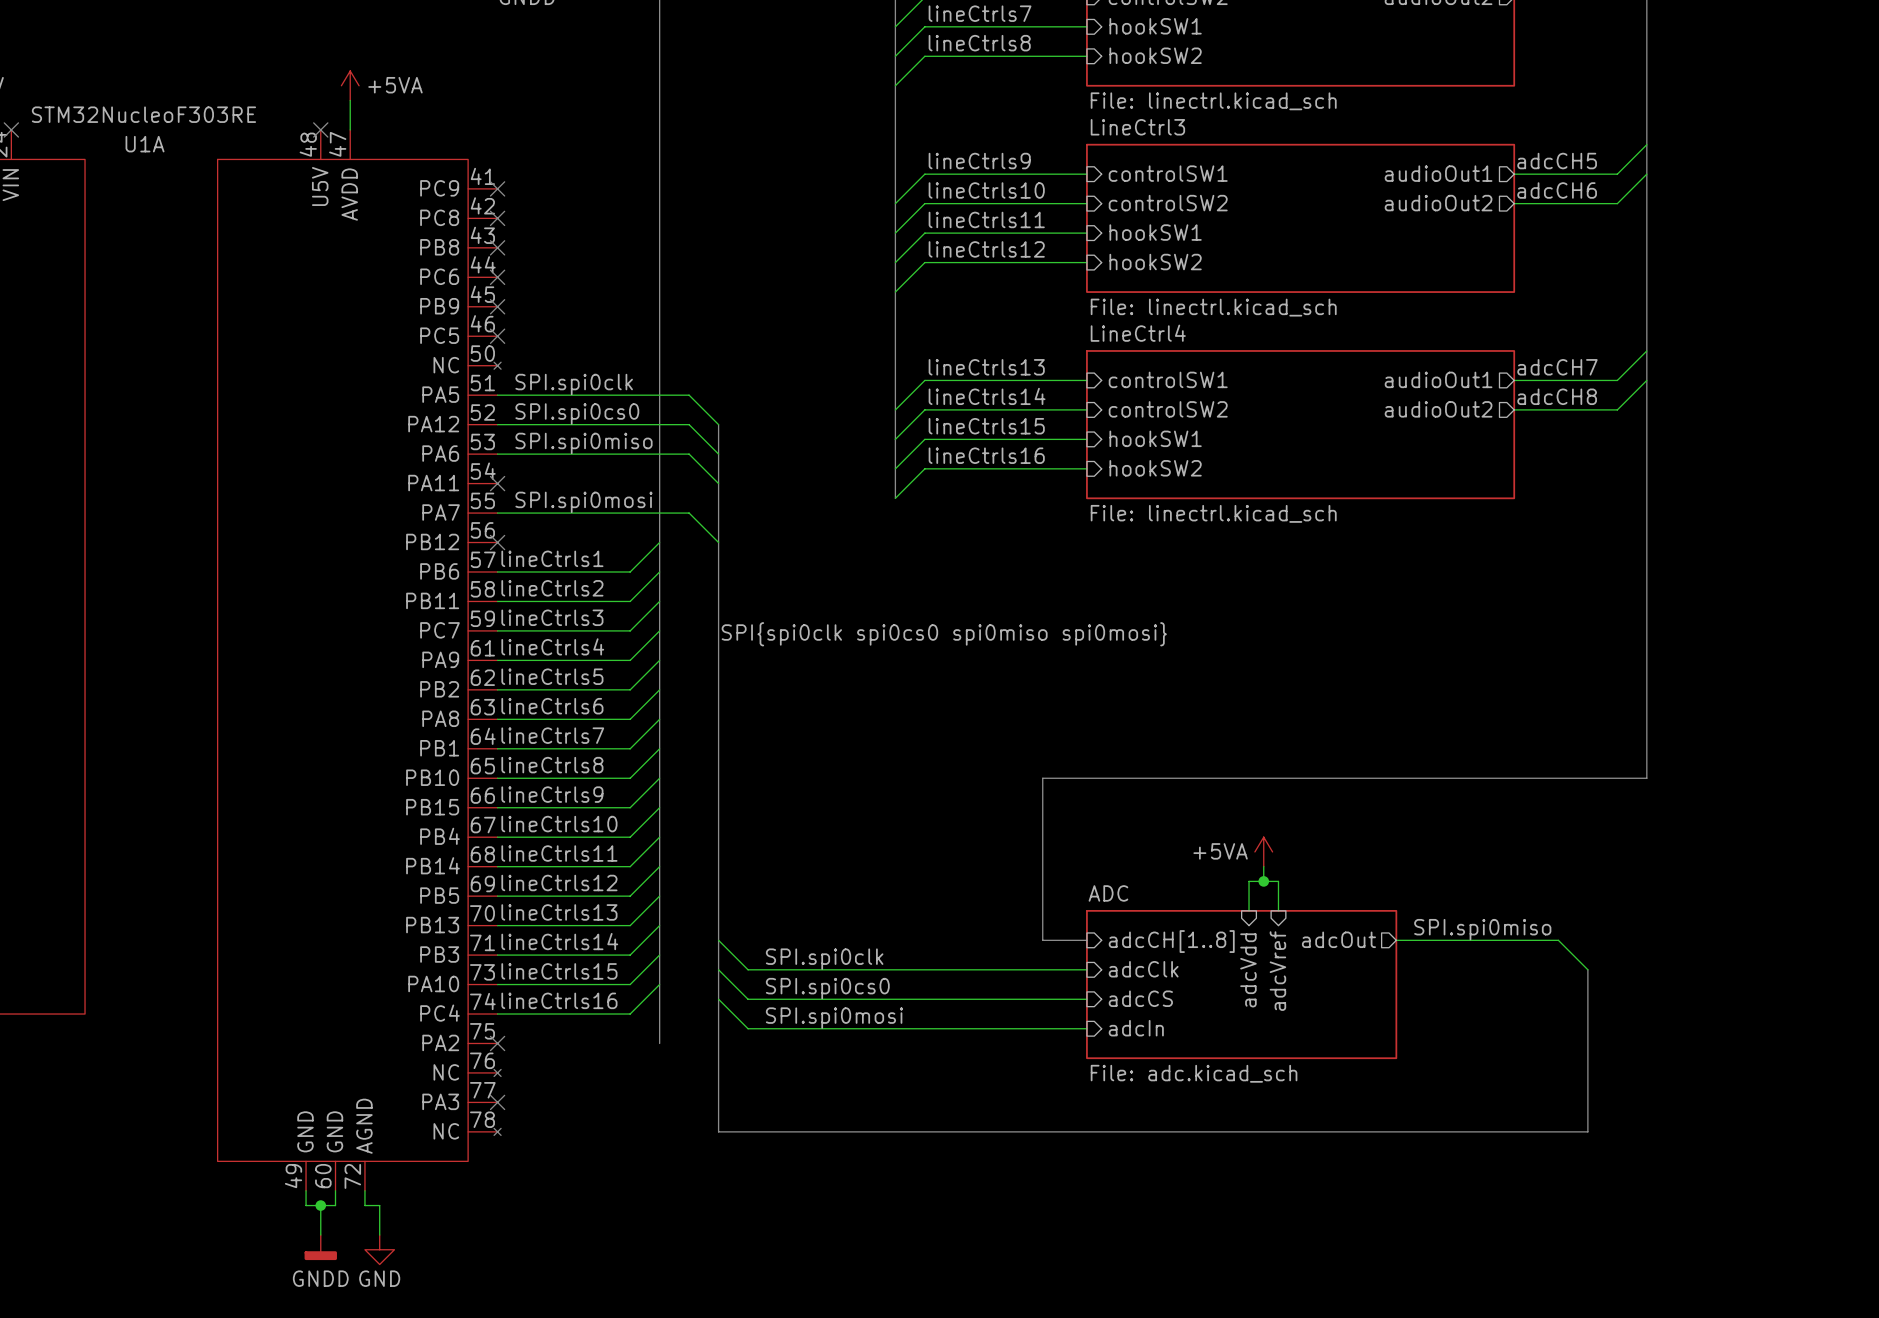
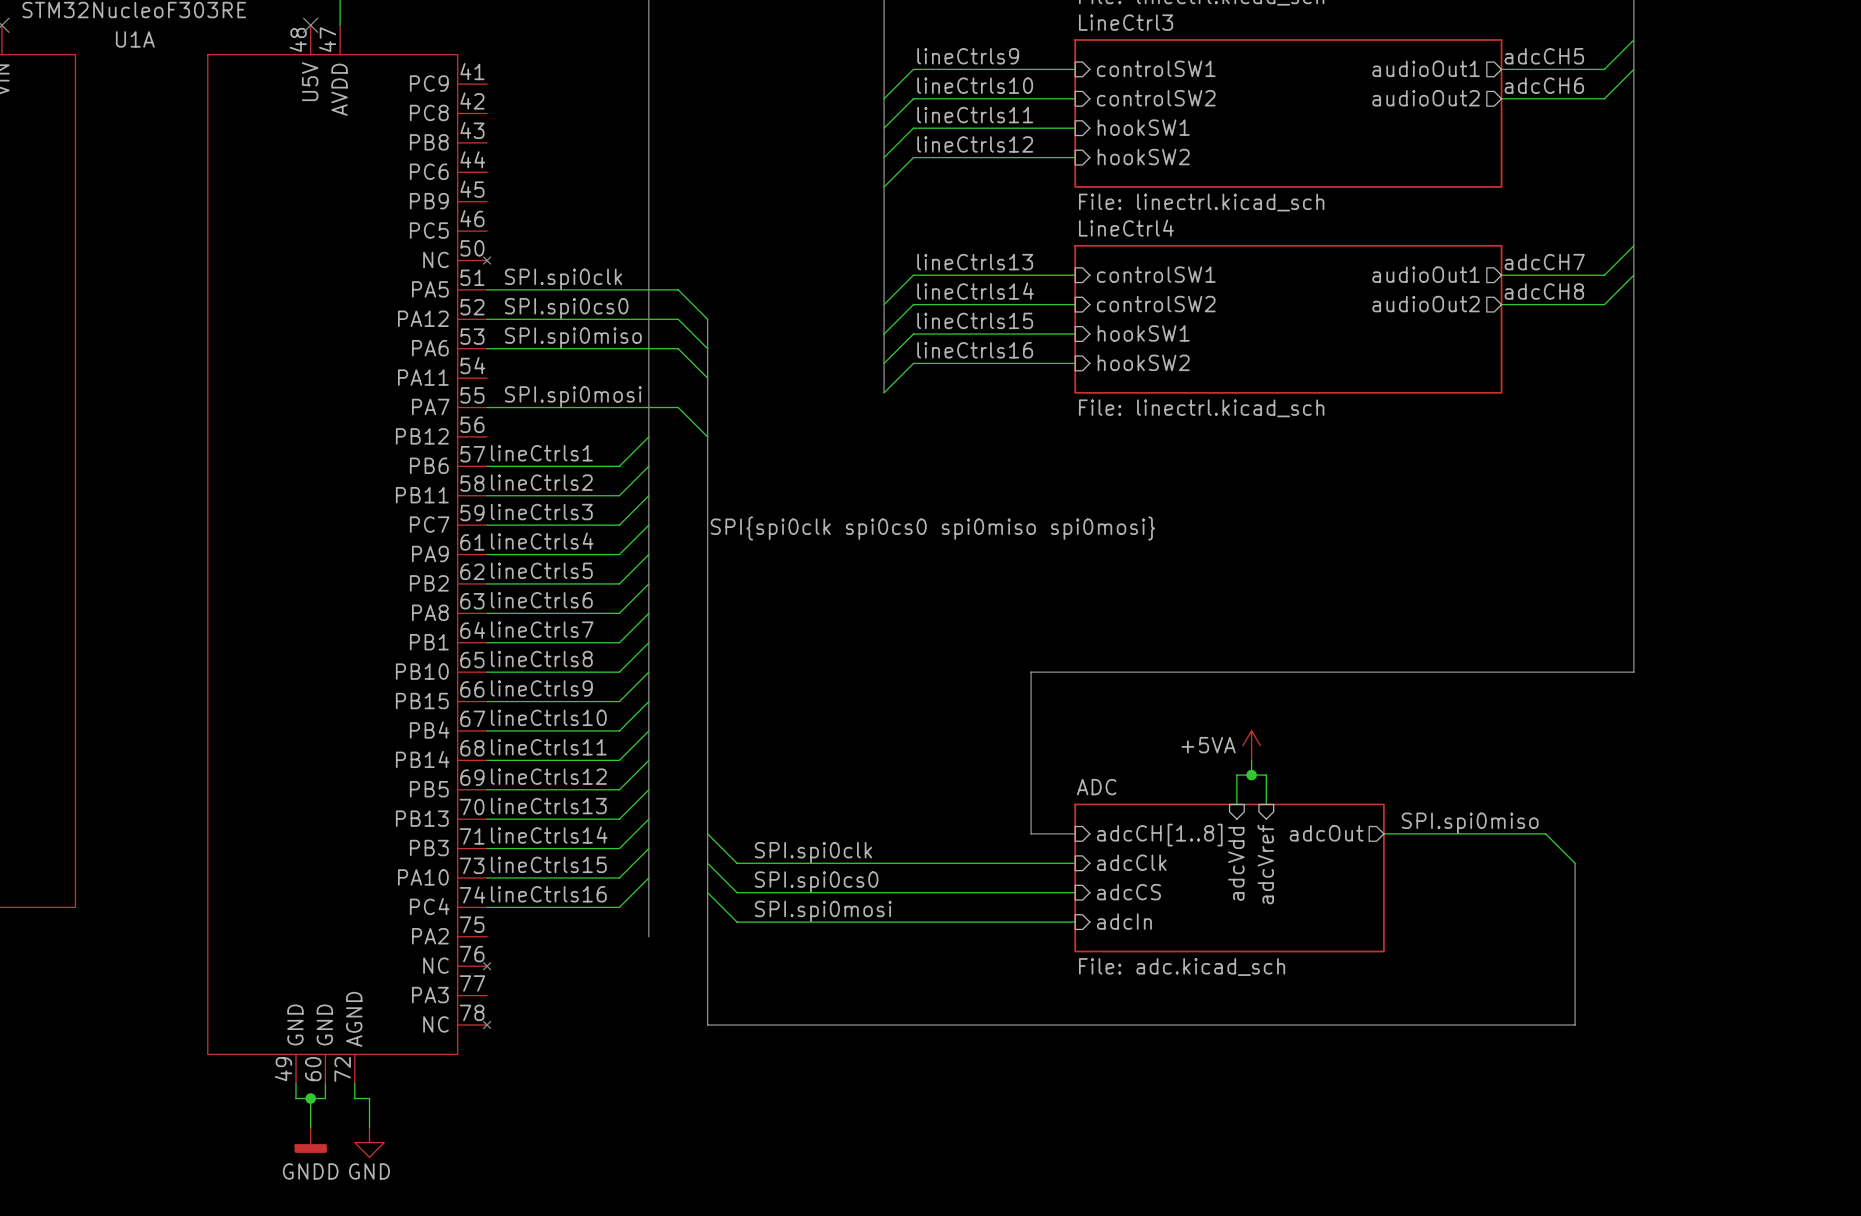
no-connect mark: (497, 188) -> none
no-connect mark: (497, 218) -> none
no-connect mark: (497, 247) -> none
no-connect mark: (497, 277) -> none
no-connect mark: (497, 306) -> none
no-connect mark: (497, 336) -> none
no-connect mark: (497, 483) -> none
no-connect mark: (497, 542) -> none
no-connect mark: (497, 1043) -> none
no-connect mark: (497, 1102) -> none

